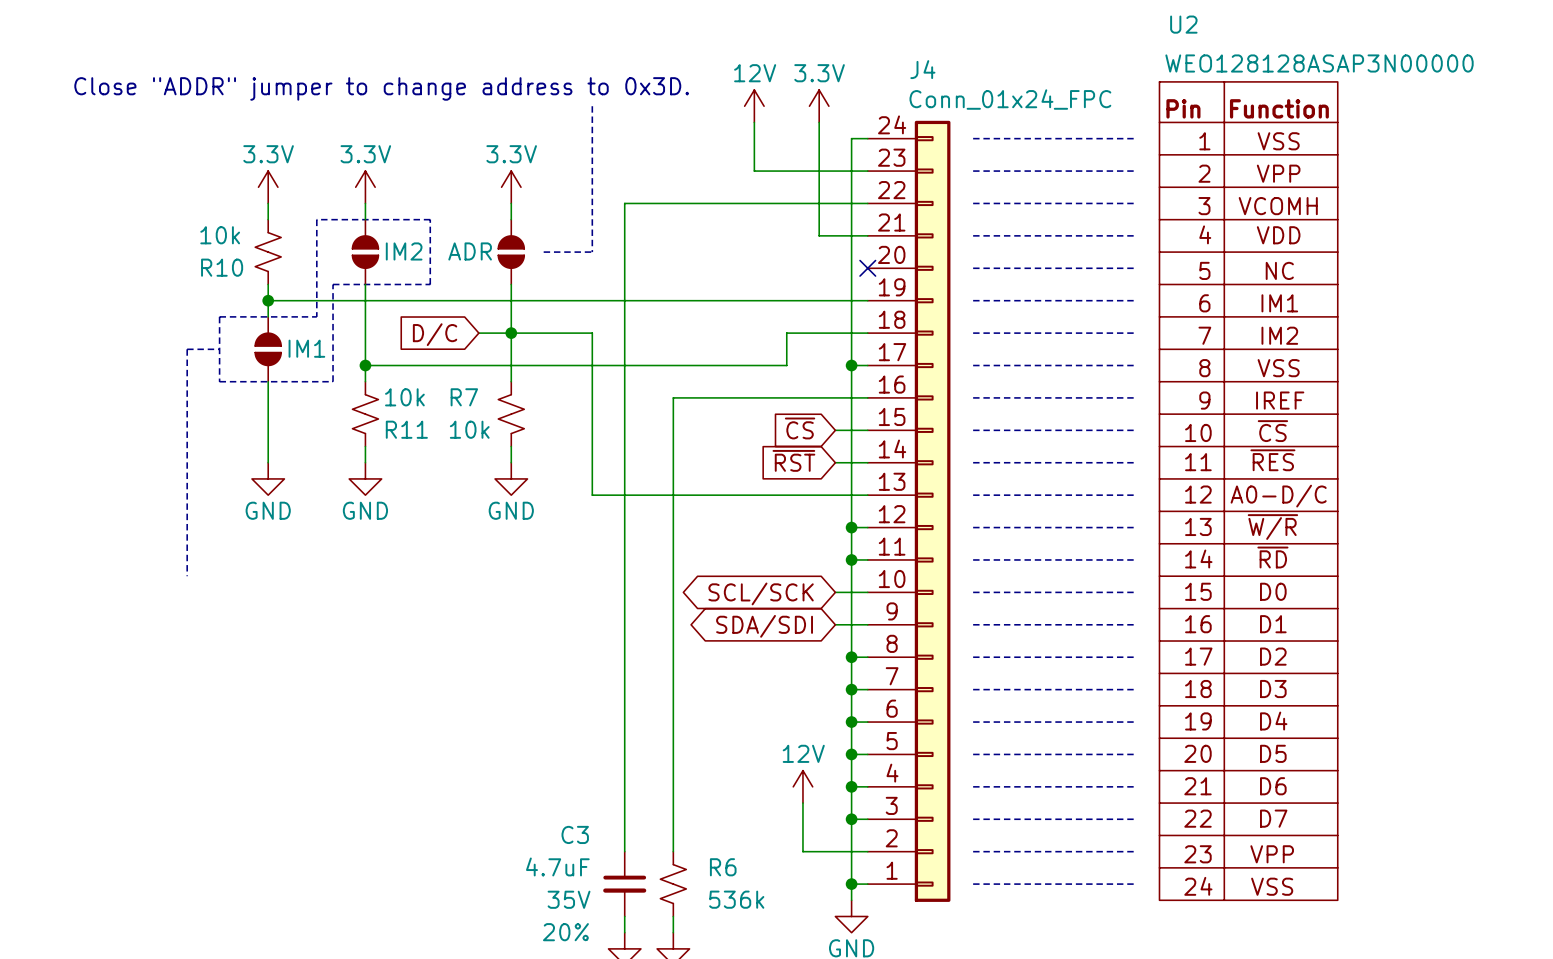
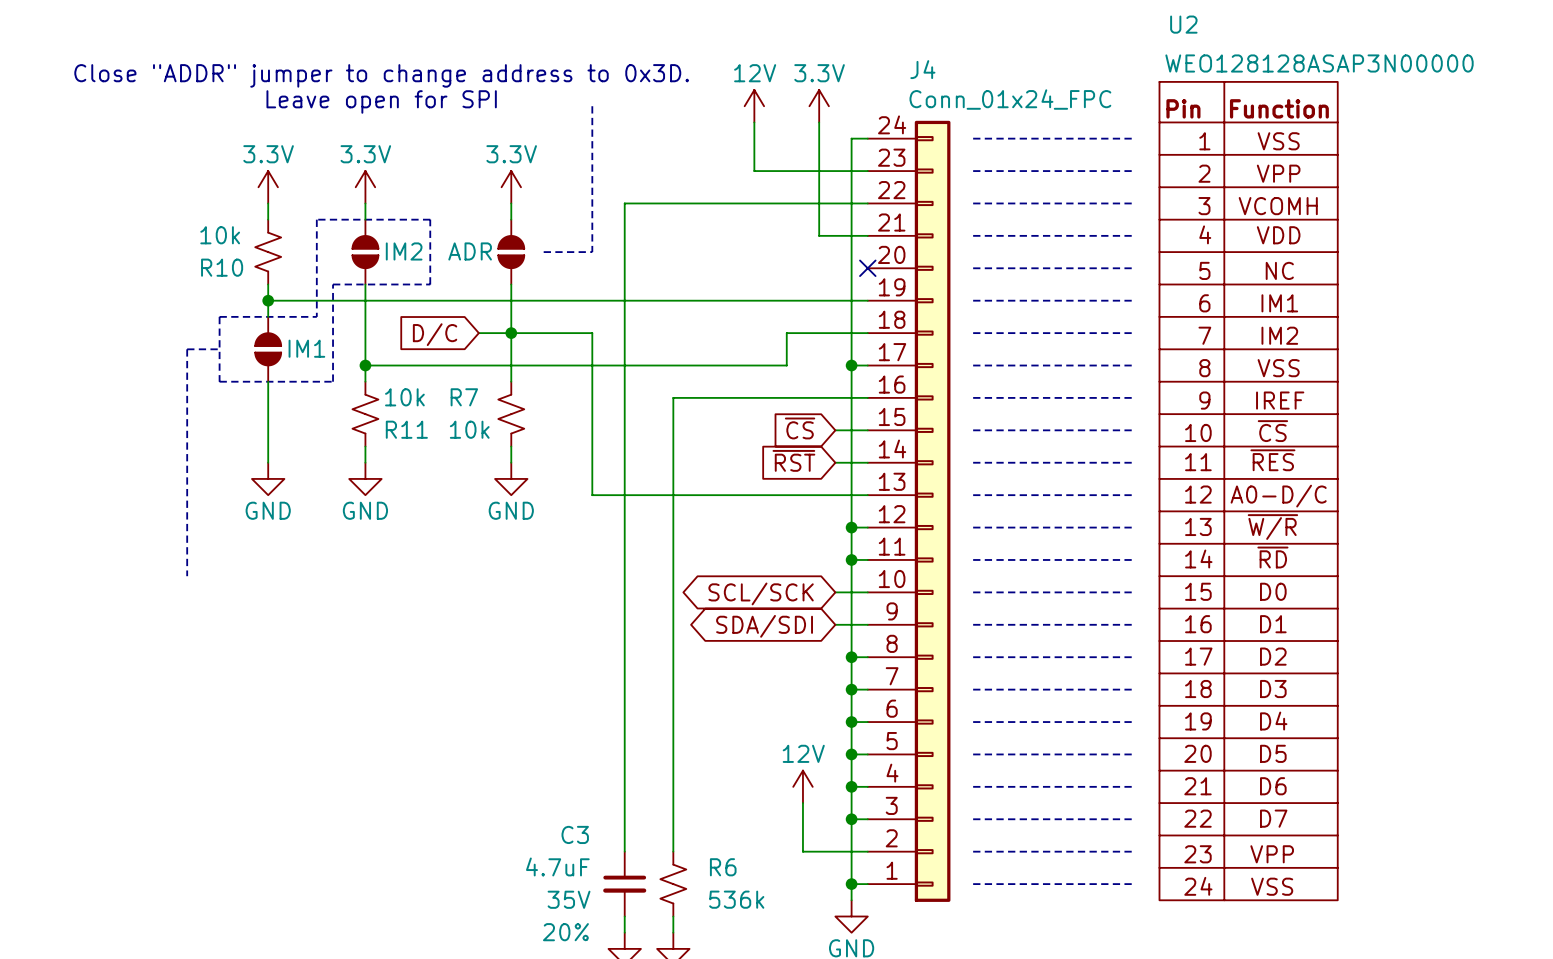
text position: Close "ADDR" jumper to change address to 0x3D. (381, 88) -> Close "ADDR" jumper to change address to 0x3D. (381, 75)
text: none -> Leave open for SPI (381, 101)

